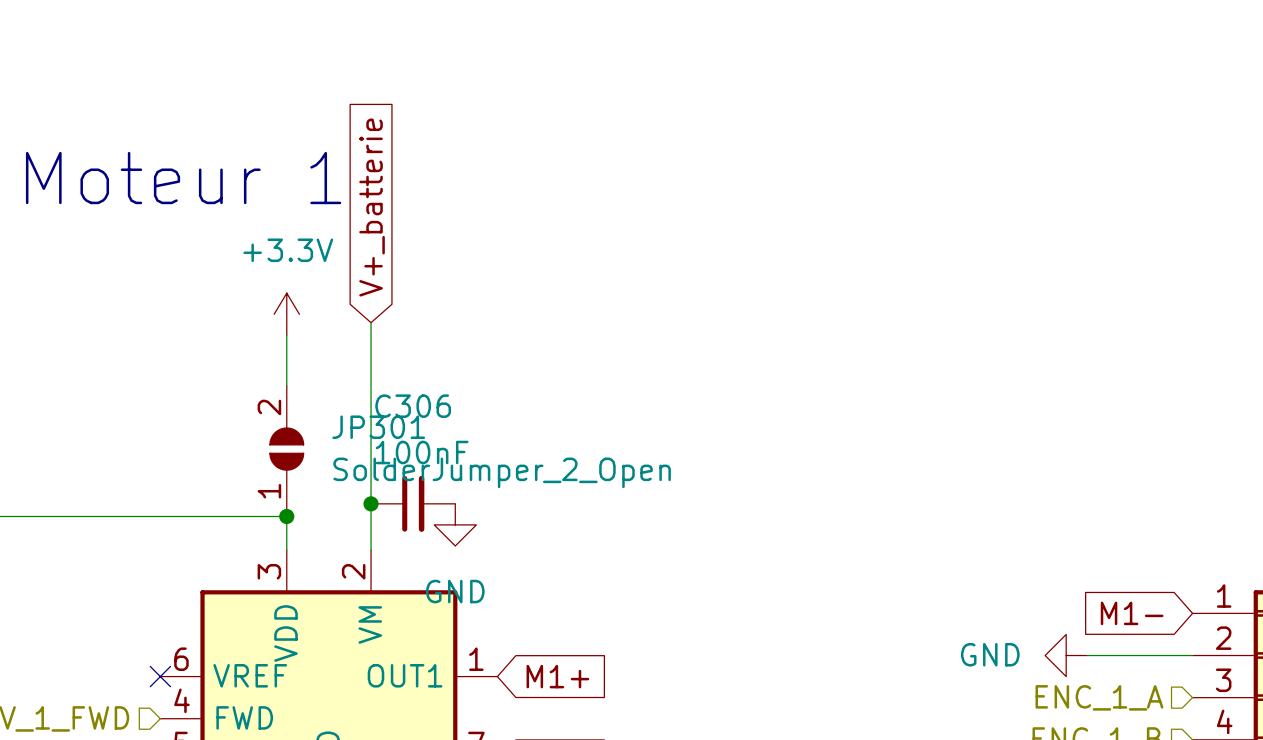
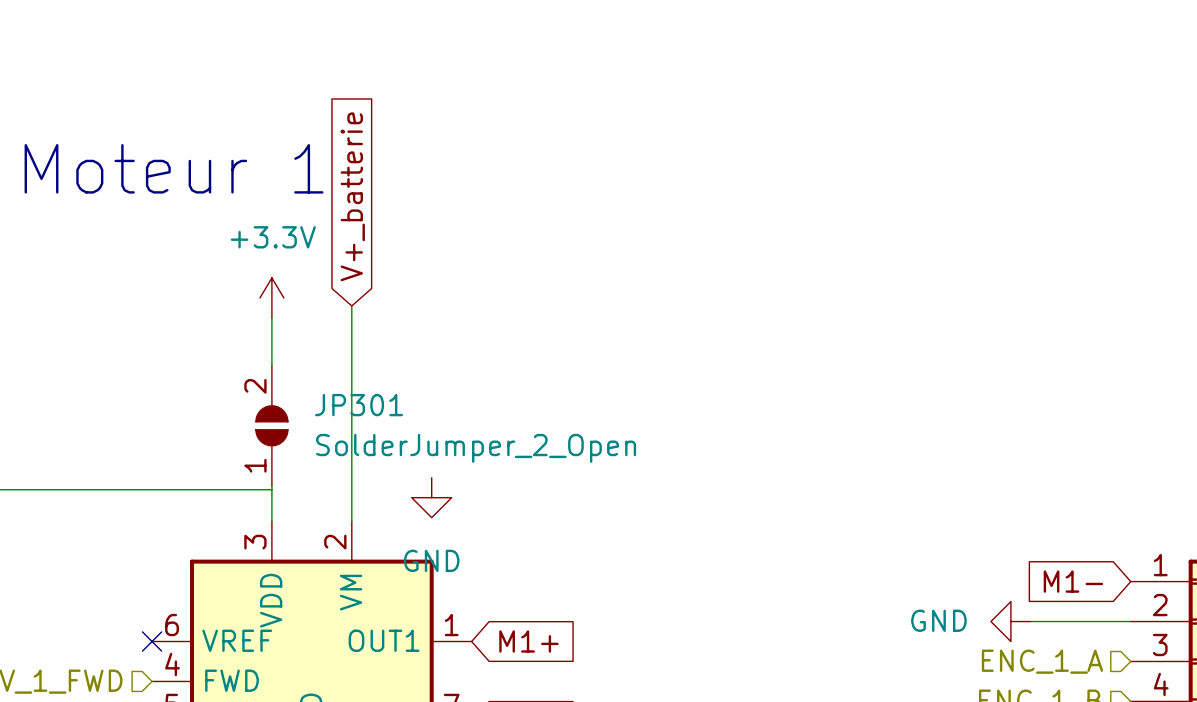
junction: (371, 503) -> none
C306: 100nF (413, 503) -> none
junction: (286, 516) -> none

